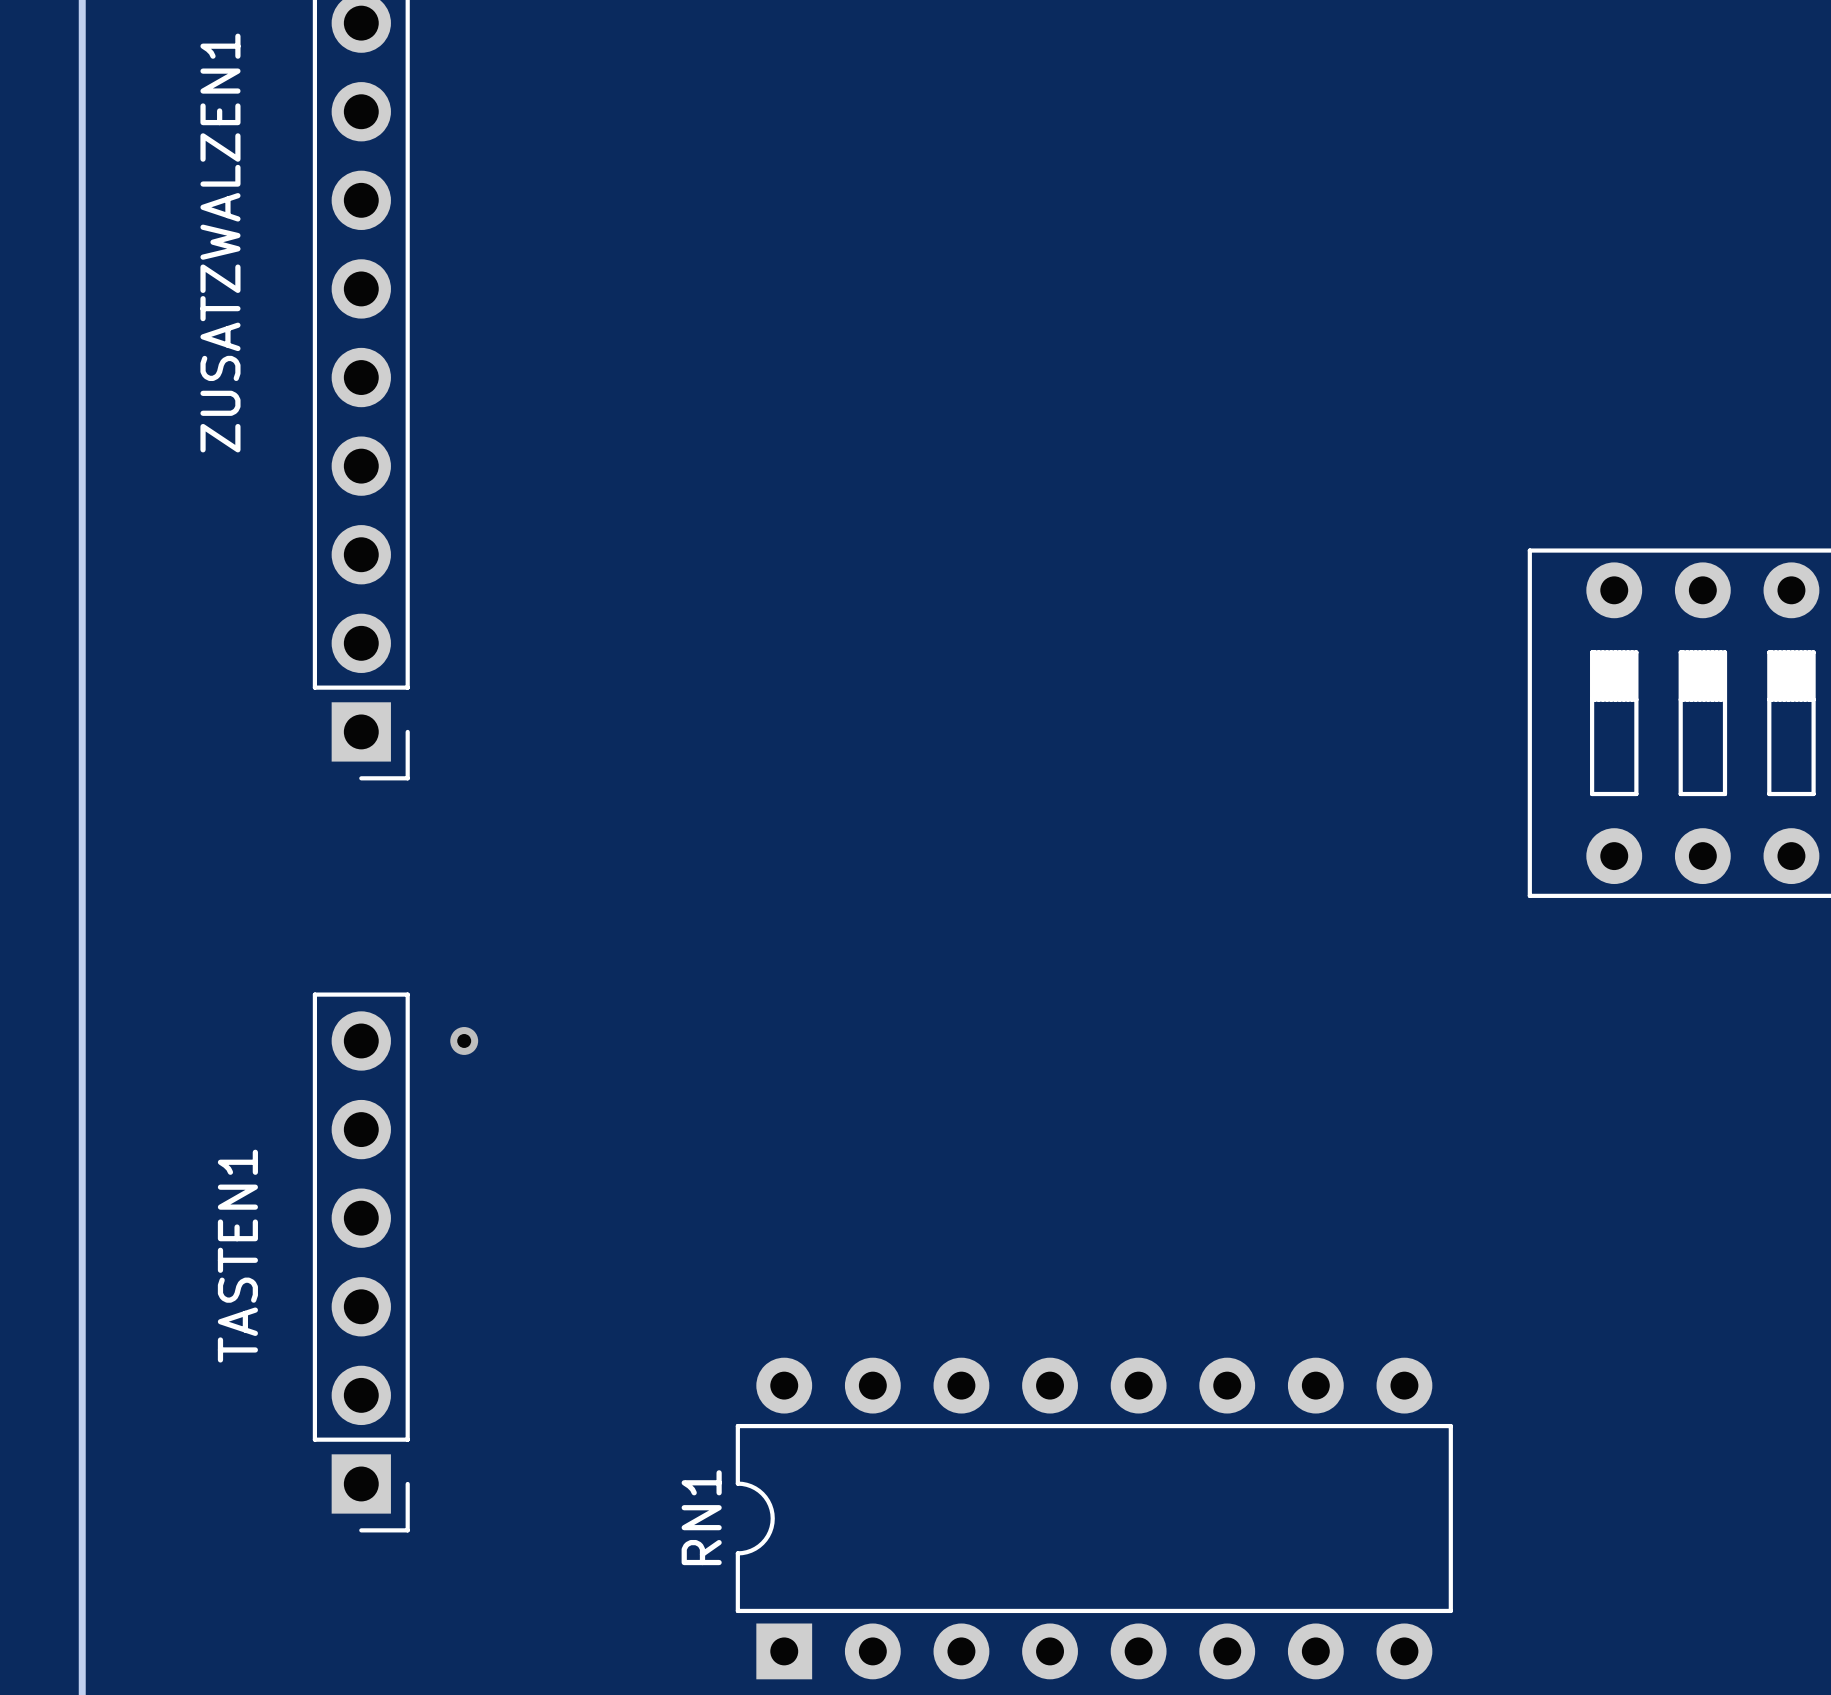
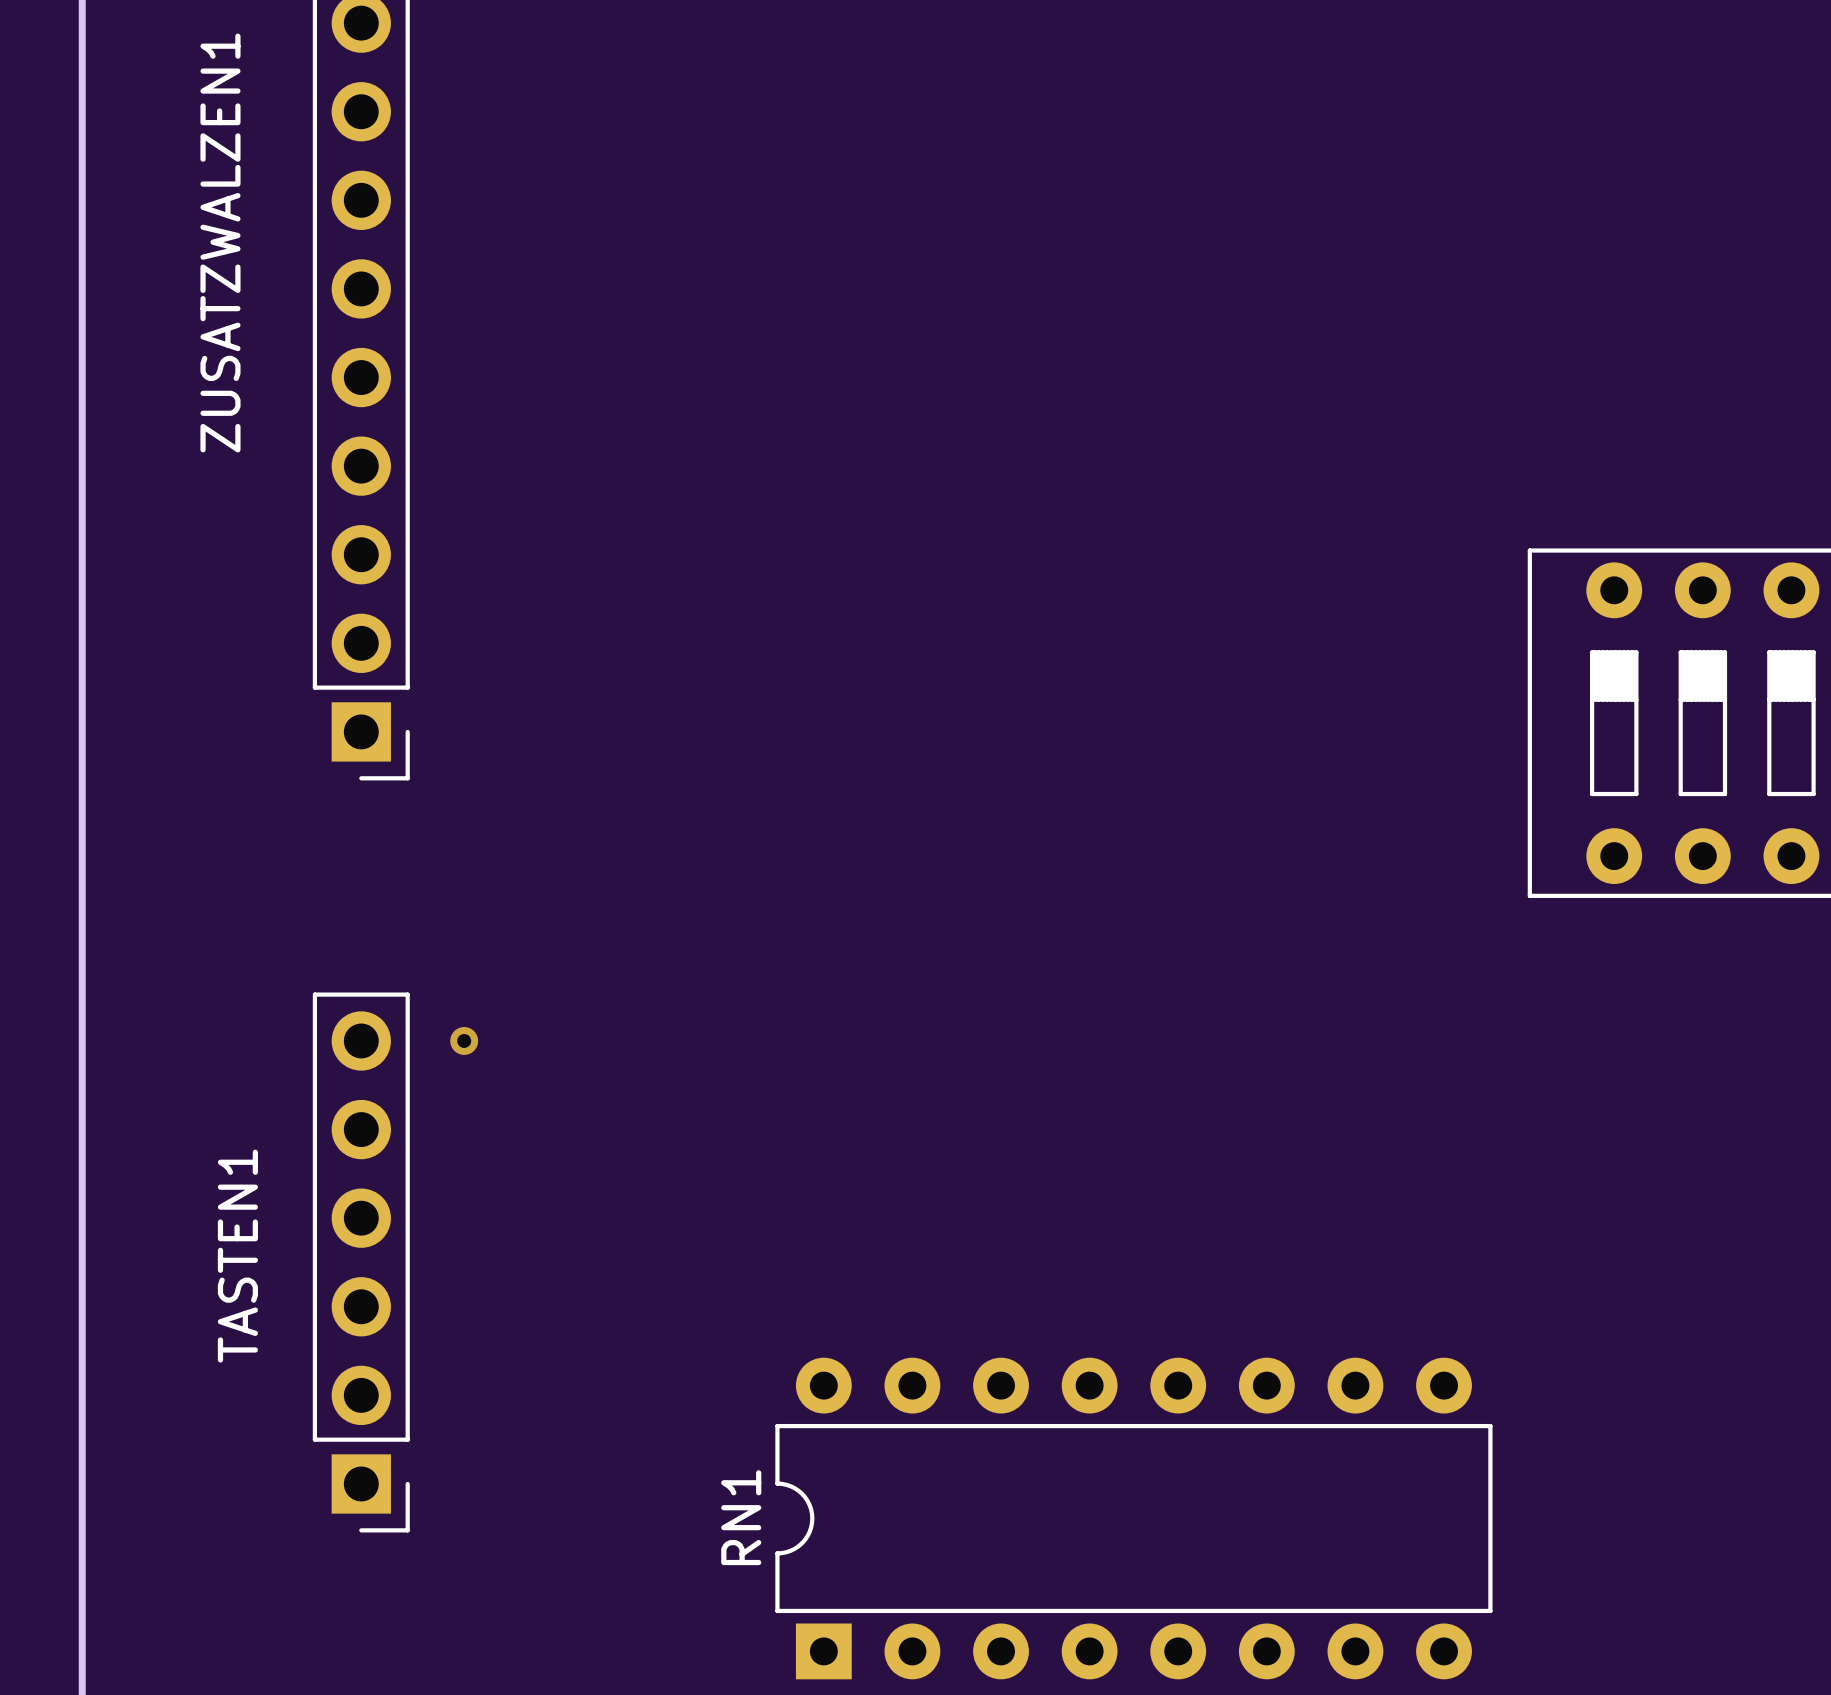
RN1 position: (1094, 1518) -> (1133, 1518)

